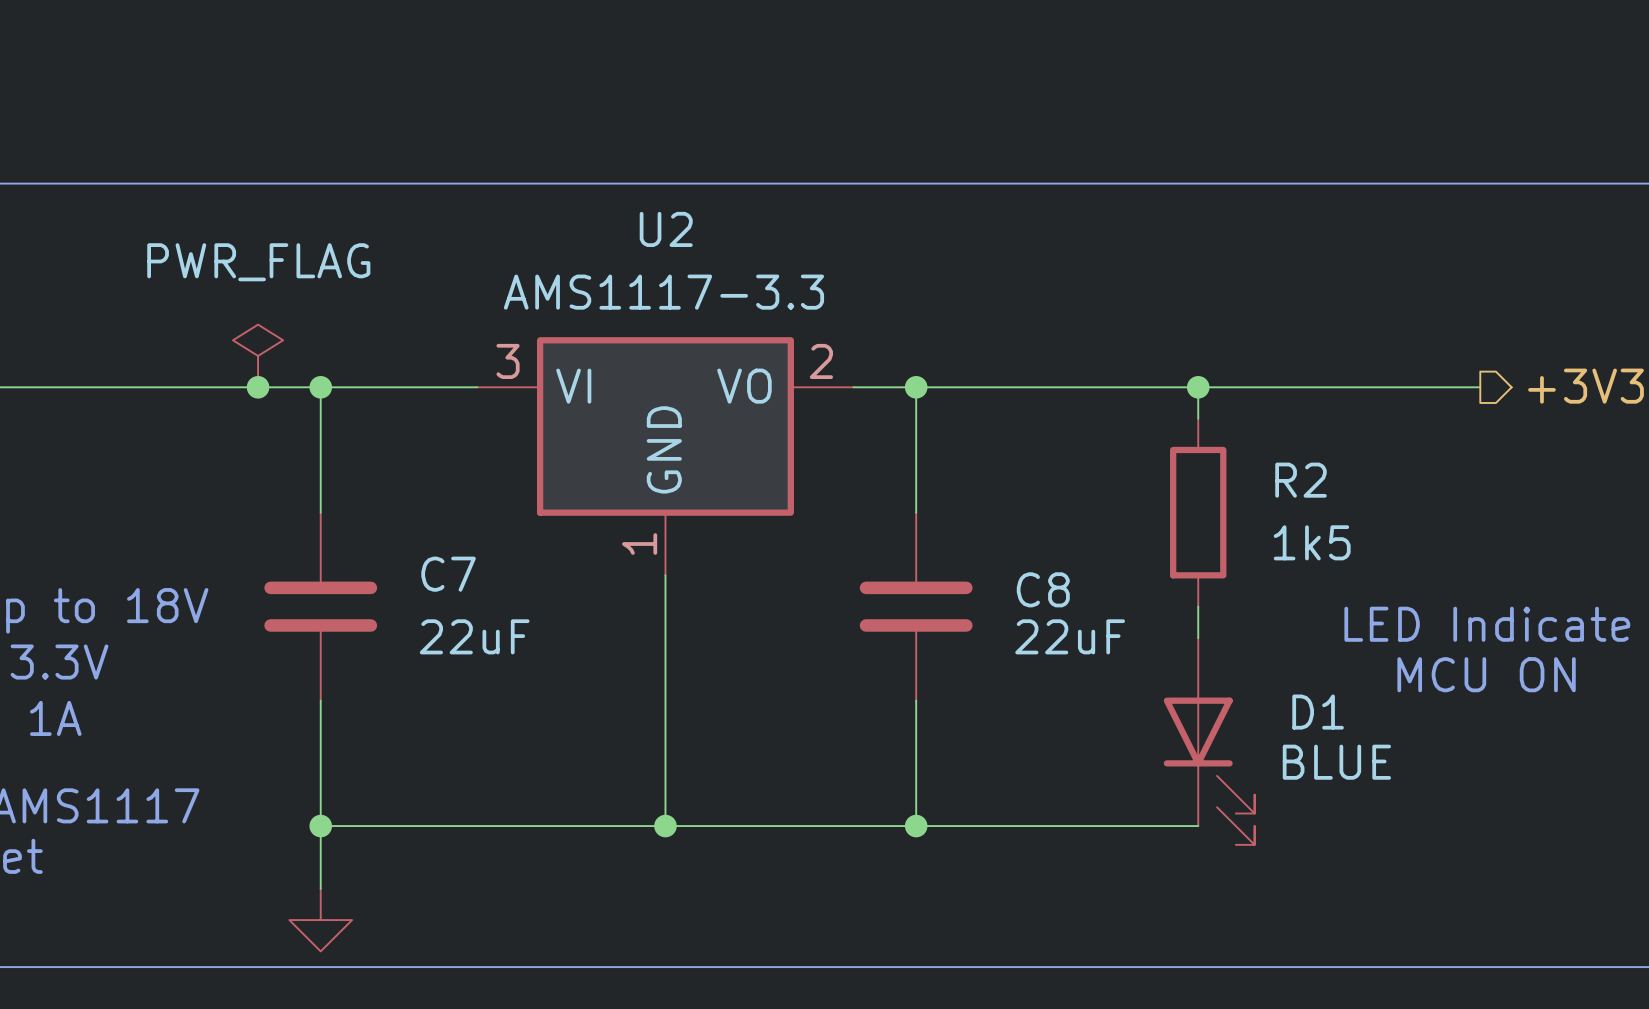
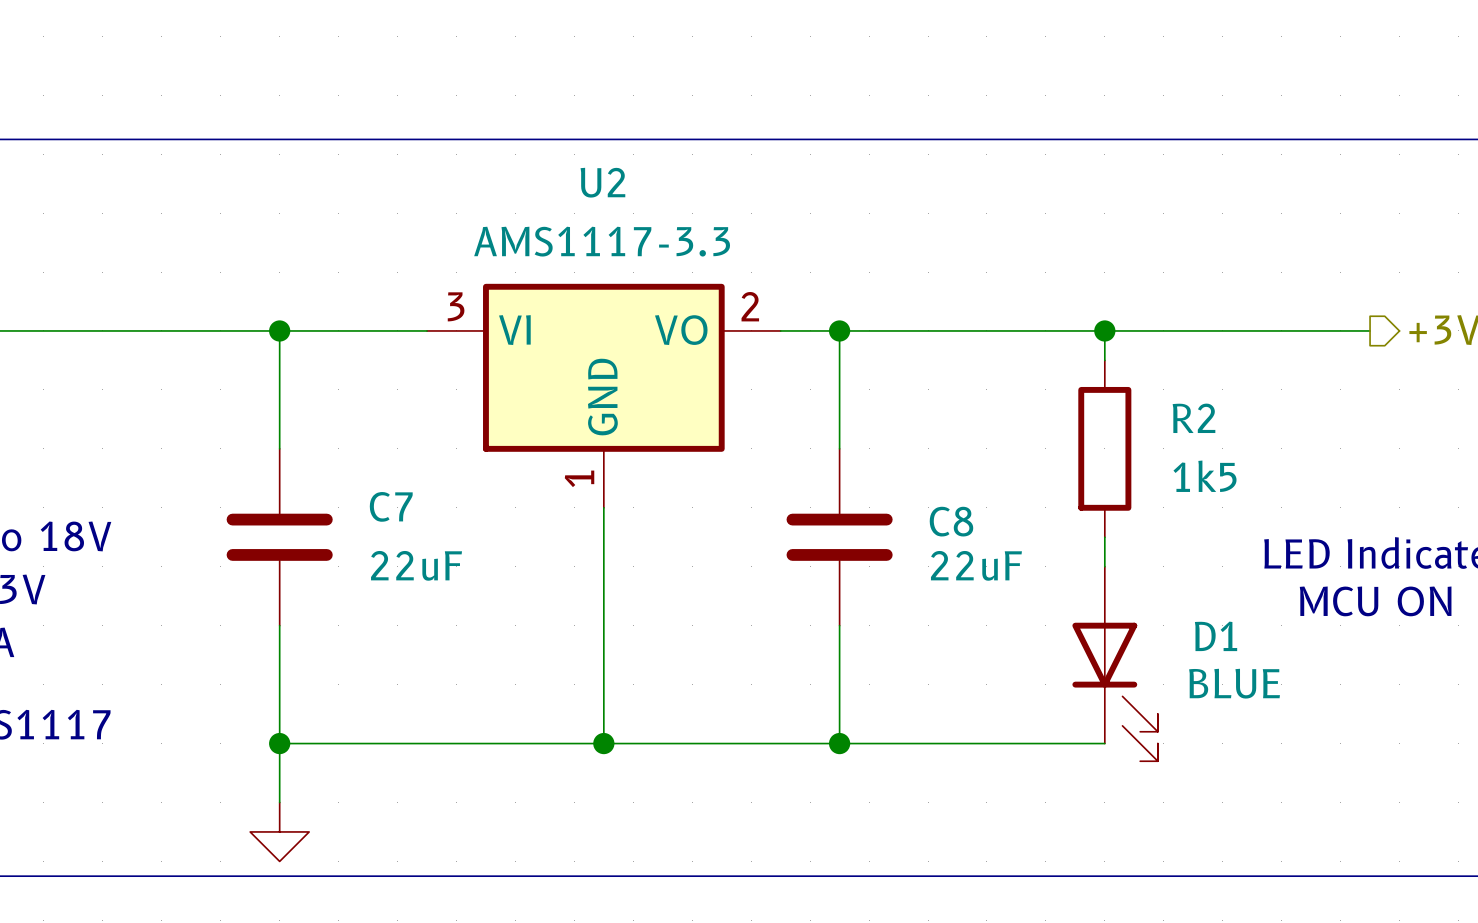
power symbol: PWR_FLAG (258, 355) -> none
junction: (258, 387) -> none

